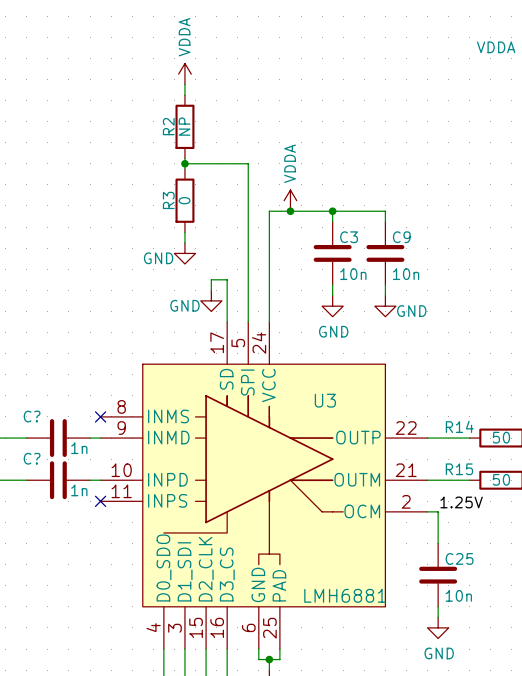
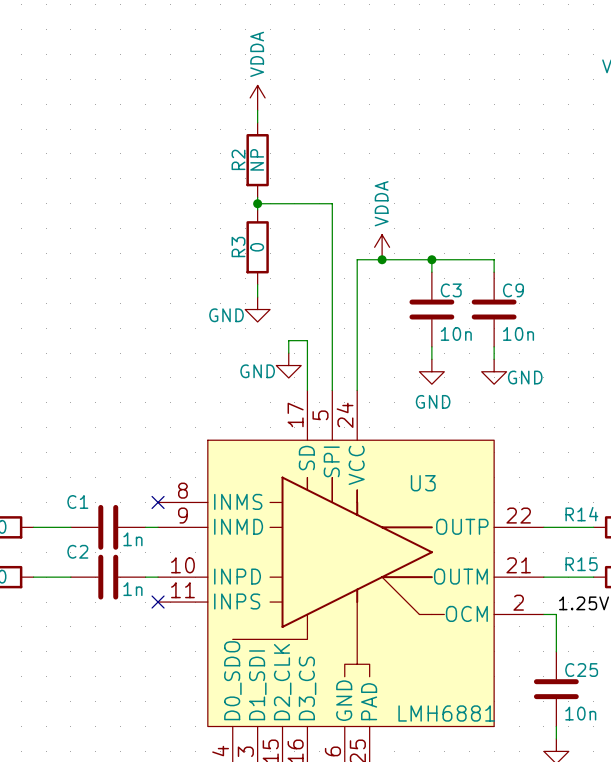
C? name: C? (32, 416) -> C1 (77, 501)
C? name: C? (32, 458) -> C2 (77, 551)

